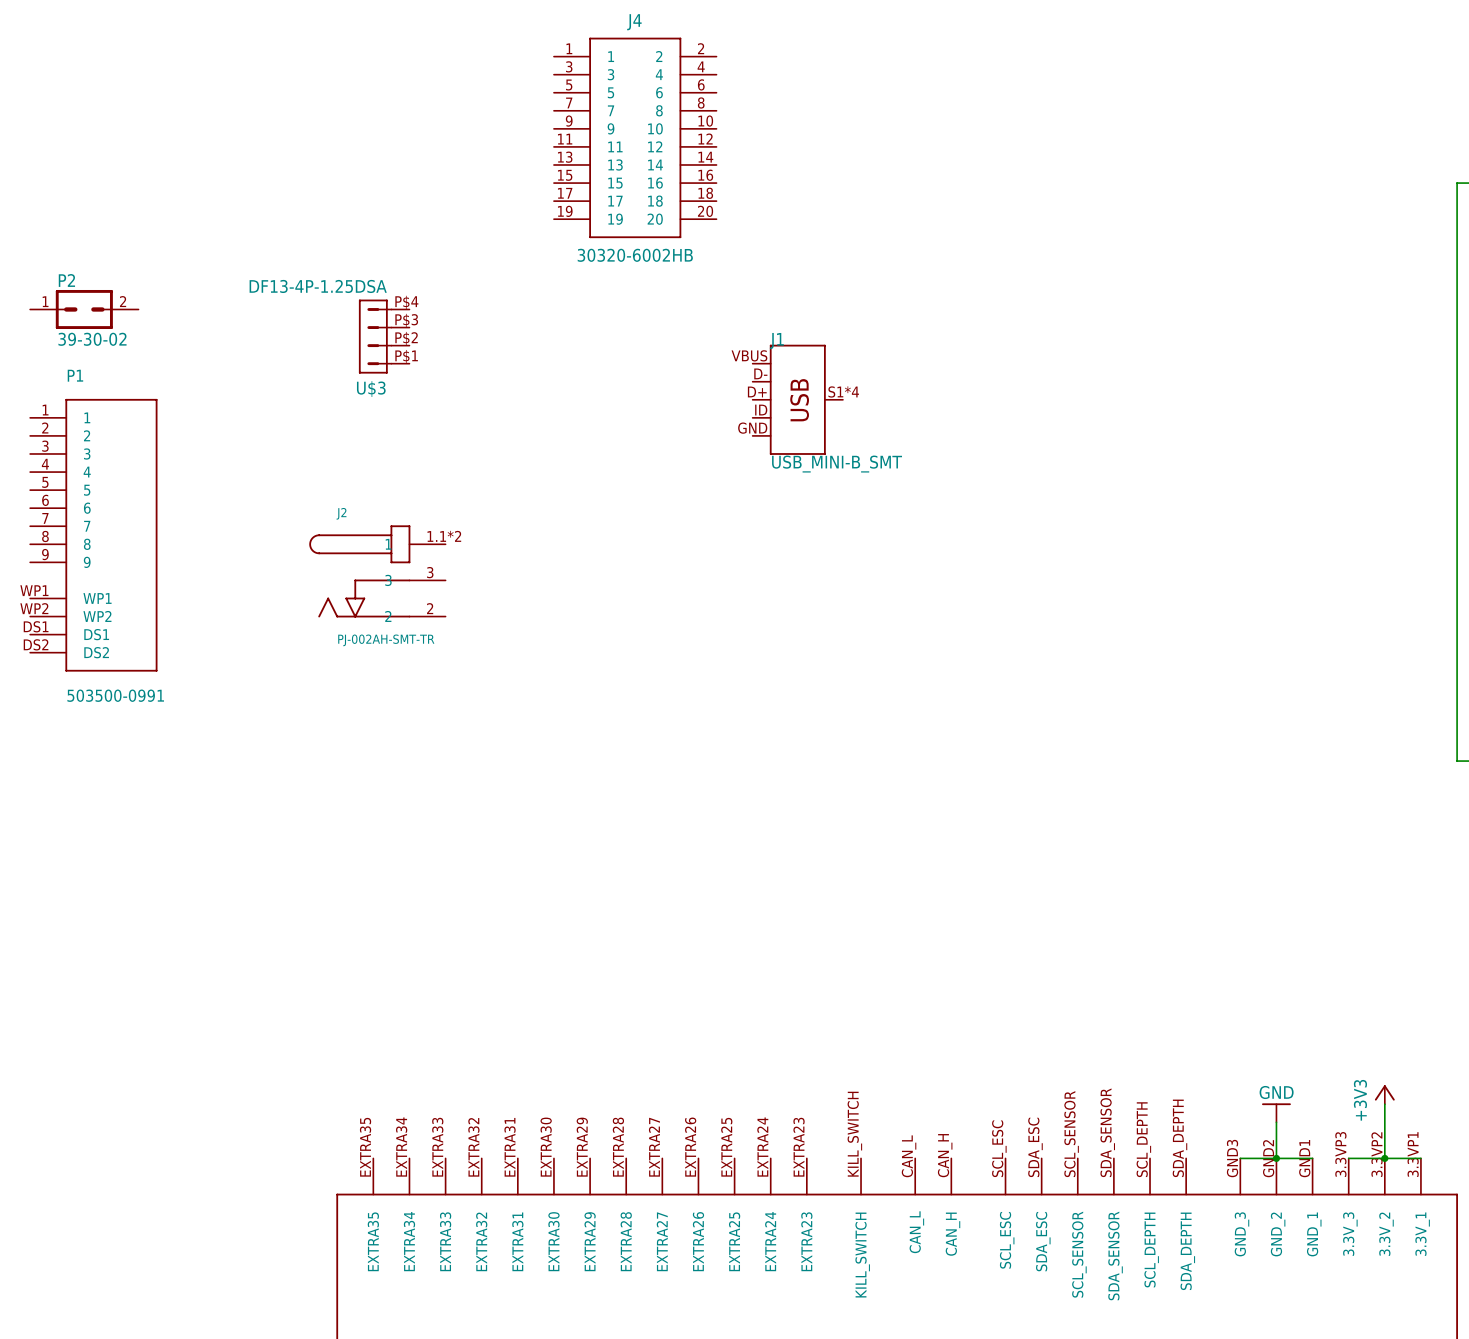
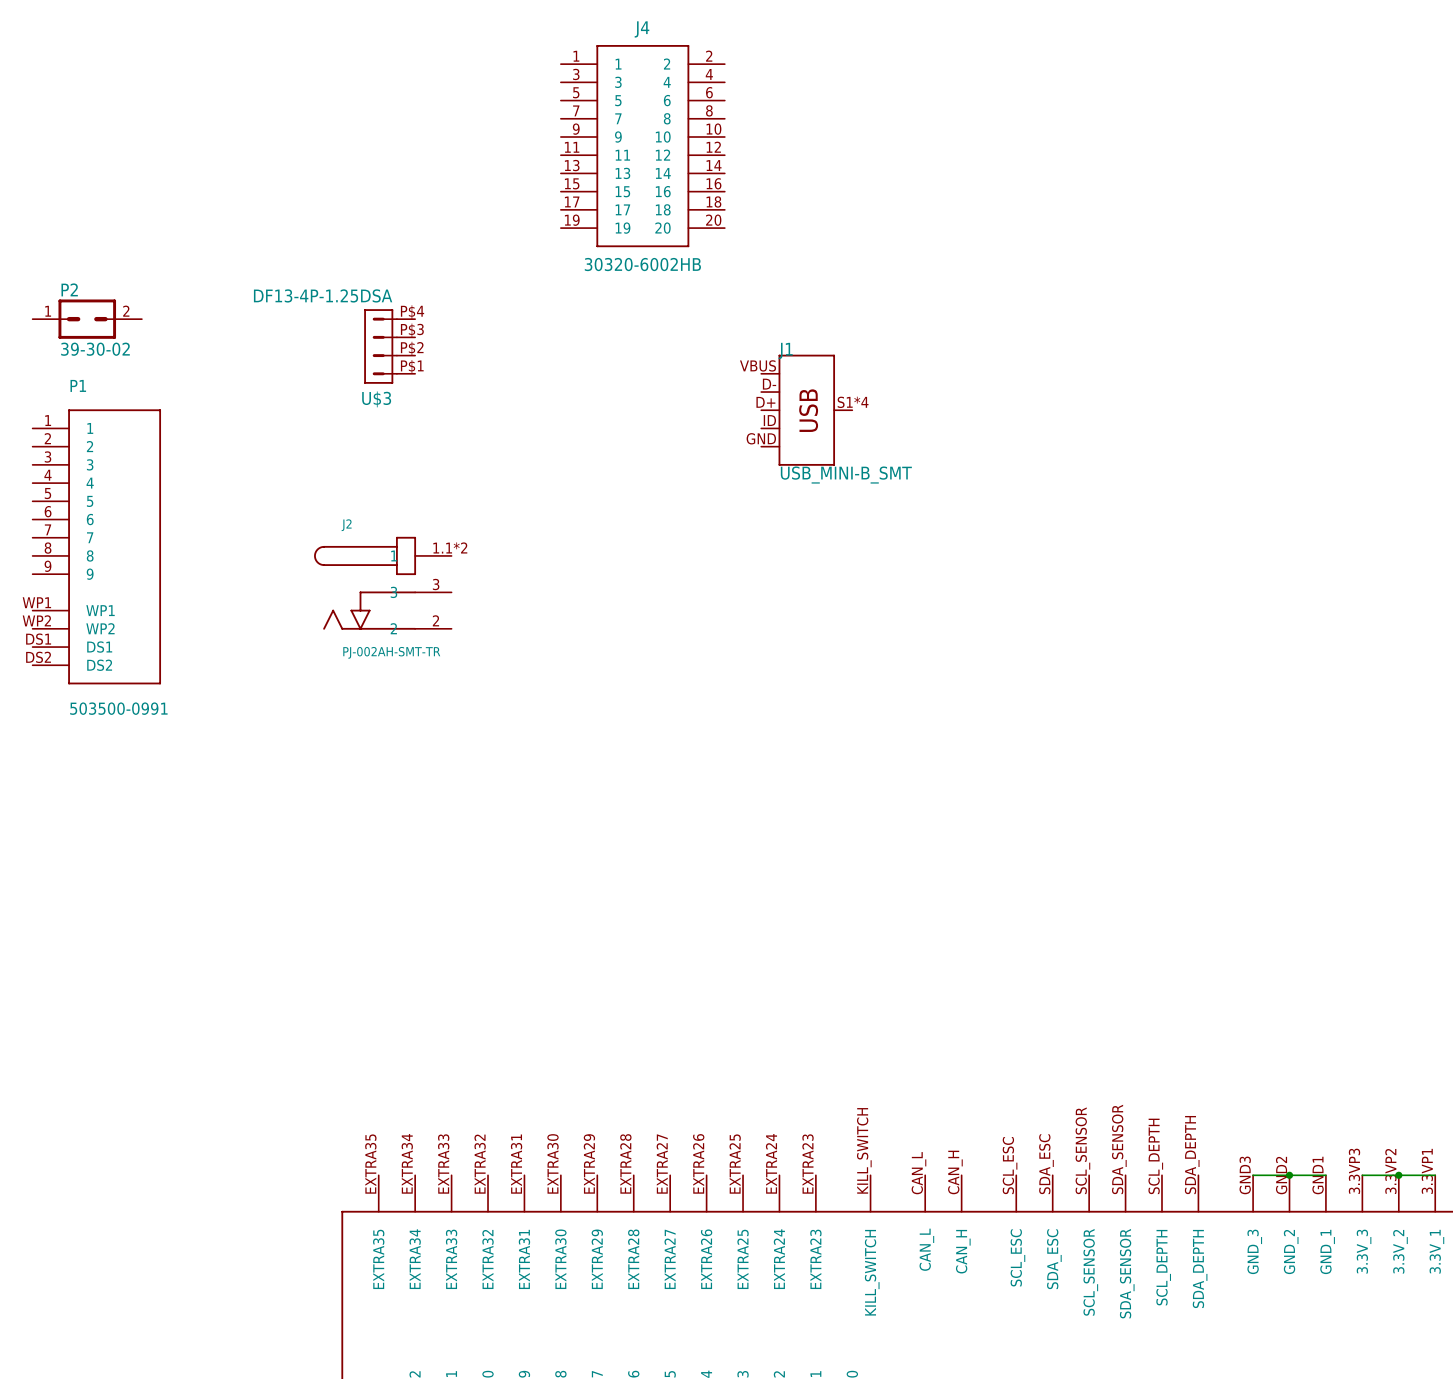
power symbol: +3V3 (1384, 1094) -> none
wire: (1384, 1104) (1384, 1158) -> none
power symbol: GND (1276, 1112) -> none
wire: (1276, 1122) (1276, 1158) -> none

